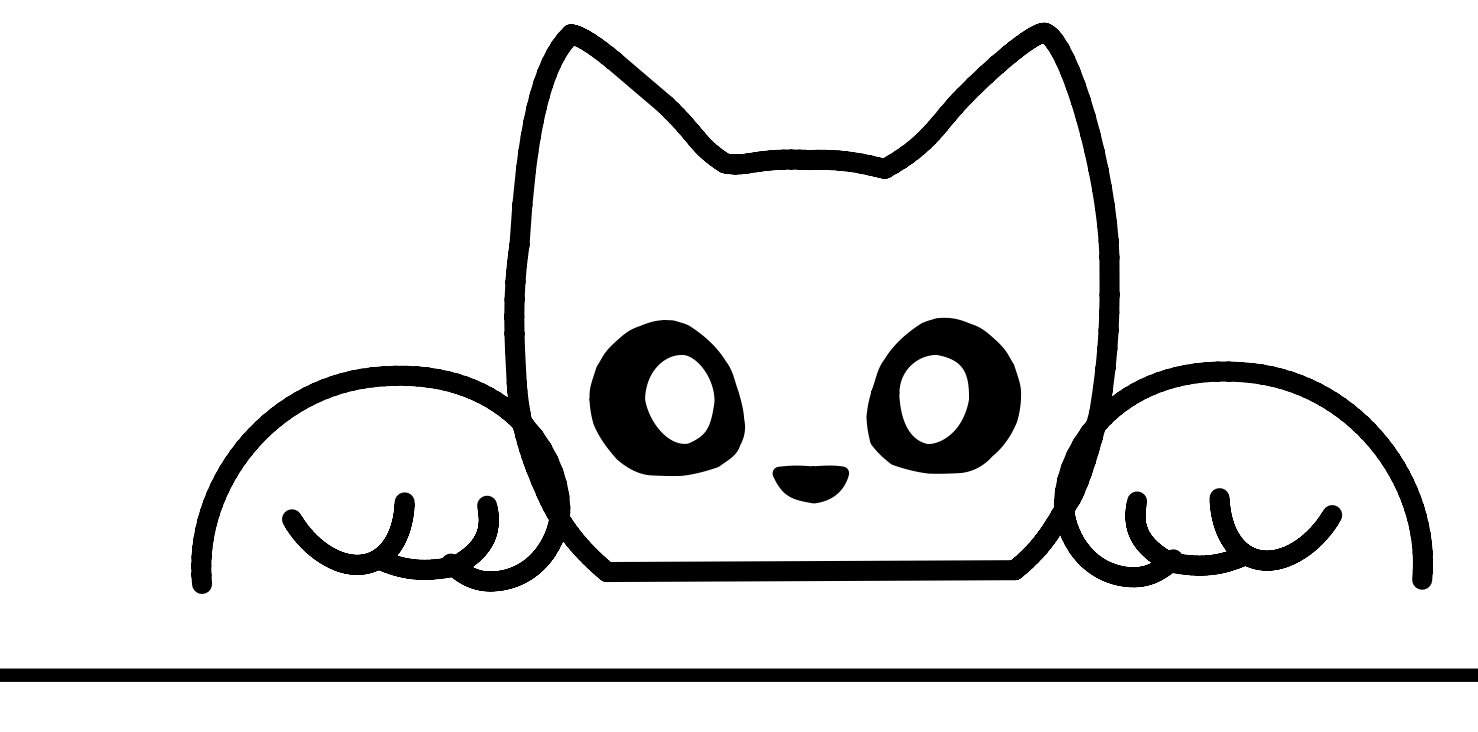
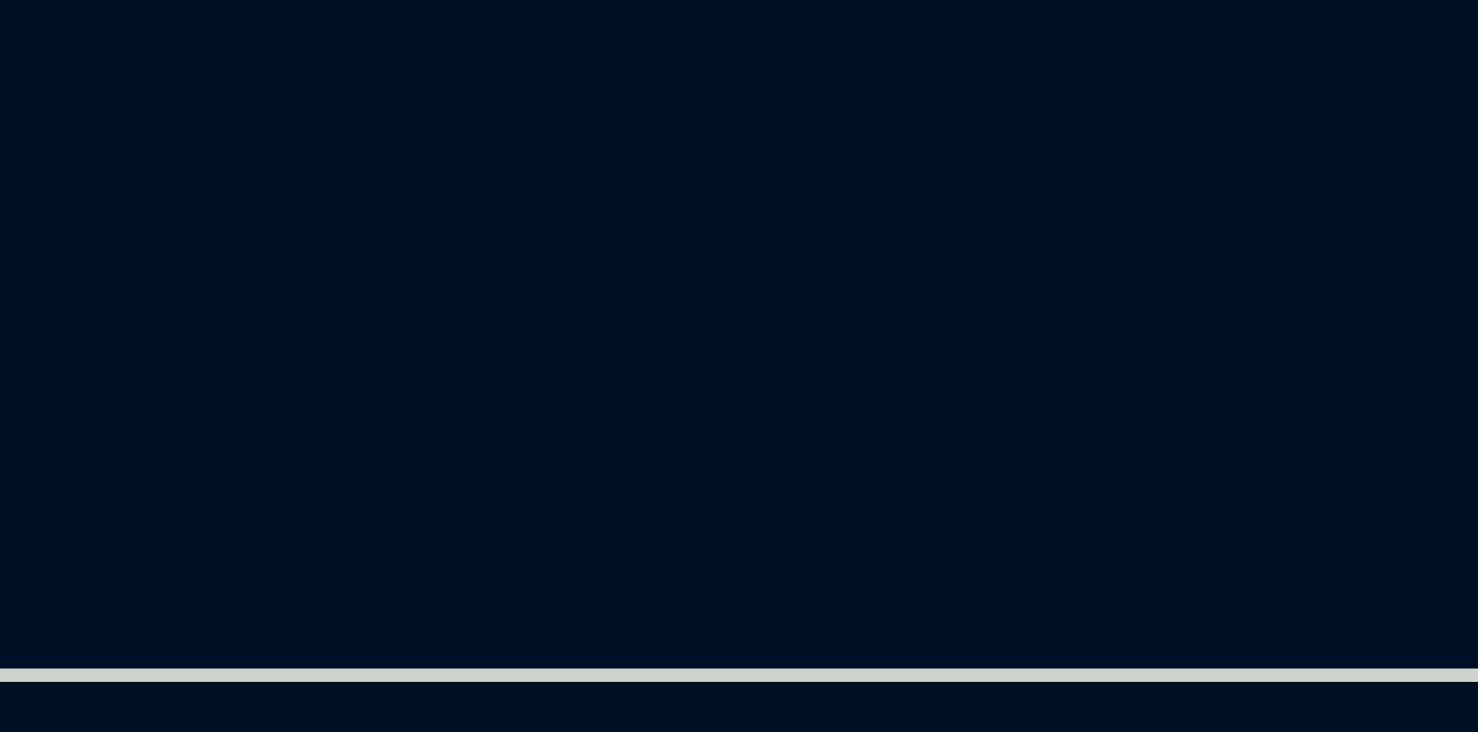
line: (1043, 32) (1026, 41) (997, 64) (959, 100) (923, 141) (885, 168) (851, 161) (824, 159) (783, 159) (740, 164) (724, 163) (705, 147) (665, 105) (607, 55) (577, 36) (571, 34) (565, 40) (555, 54) (543, 84) (528, 152) (515, 281) (514, 333) (516, 383) (520, 413) (526, 441) (549, 499) (573, 538) (606, 572) (1014, 570) (1043, 541) (1074, 490) (1099, 412) (1107, 348) (1109, 294) (1107, 224) (1101, 188) (1090, 134) (1075, 85) (1065, 59) (1054, 41) (1044, 32) -> none
drawing: [589, 317, 1022, 504] -> none
line: (1219, 498) (1222, 520) (1231, 541) (1244, 553) (1260, 560) (1279, 558) (1299, 549) (1315, 536) (1332, 515) -> none
line: (1137, 501) (1135, 519) (1139, 535) (1150, 549) (1168, 562) (1206, 565) (1223, 562) (1244, 555) -> none
line: (404, 502) (401, 524) (392, 545) (380, 558) (363, 564) (344, 563) (324, 554) (304, 536) (292, 519) -> none
line: (487, 505) (488, 523) (484, 539) (473, 553) (455, 566) (417, 569) (400, 566) (379, 559) -> none
line: (1173, 559) (1154, 572) (1134, 577) (1111, 573) (1090, 560) (1073, 540) (1065, 518) (1064, 492) (1070, 468) (1082, 444) (1099, 421) (1116, 406) (1136, 392) (1159, 382) (1186, 374) (1217, 371) (1240, 372) (1280, 378) (1316, 392) (1347, 412) (1374, 437) (1400, 475) (1414, 508) (1421, 543) (1422, 579) -> none
line: (450, 563) (469, 576) (489, 581) (512, 577) (534, 565) (550, 544) (558, 522) (559, 496) (553, 472) (541, 448) (524, 425) (508, 410) (488, 396) (464, 386) (437, 378) (406, 375) (384, 376) (343, 382) (307, 396) (276, 416) (249, 442) (223, 479) (209, 512) (202, 547) (202, 583) -> none

